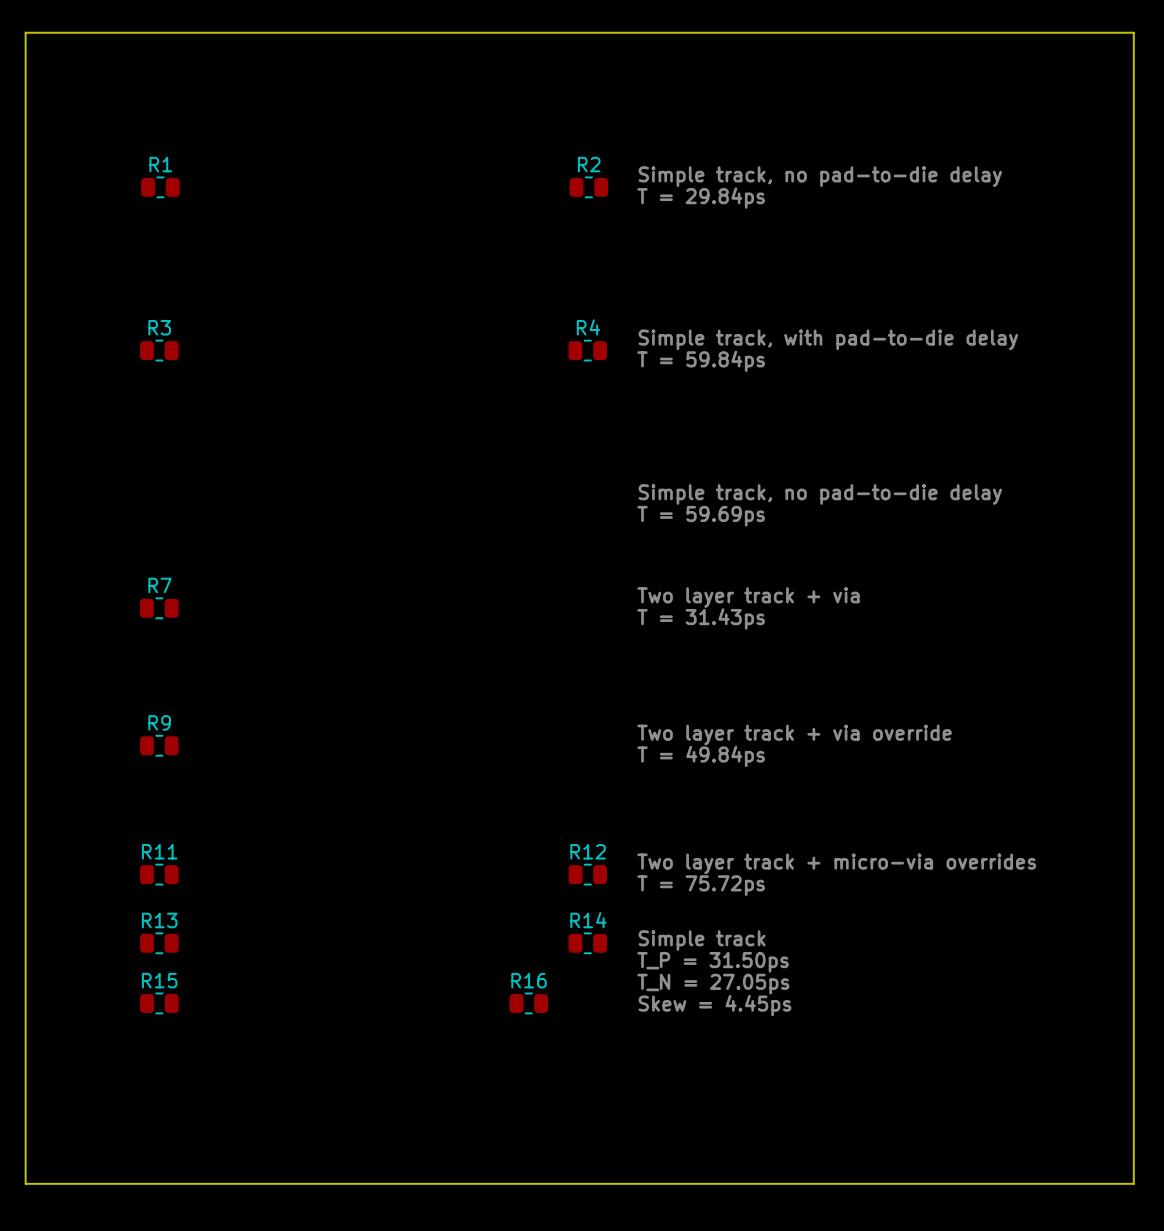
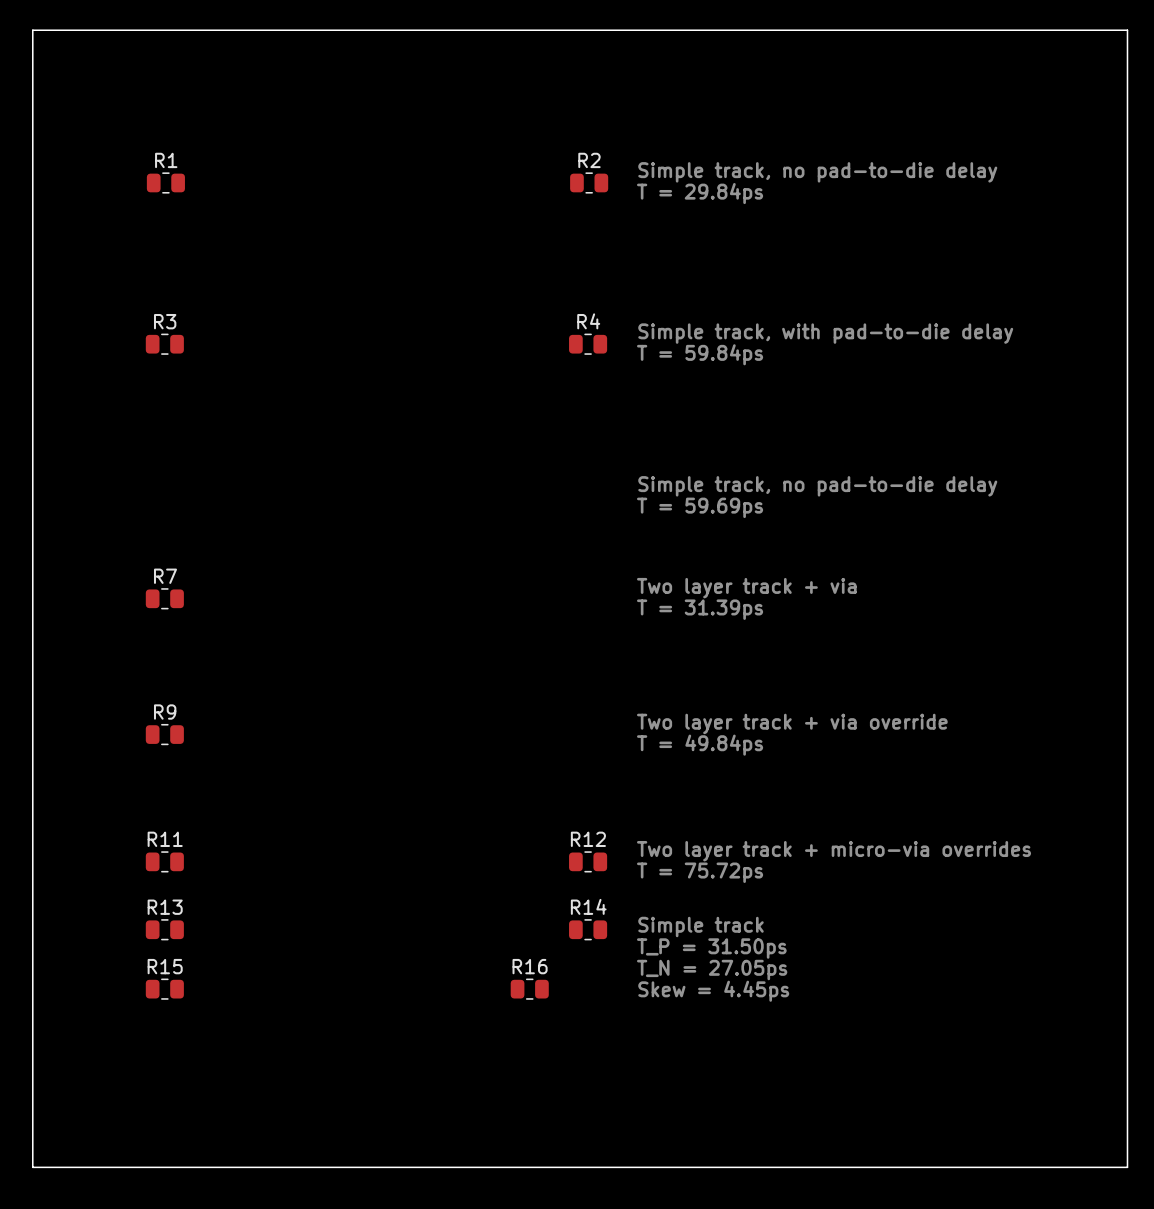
text: T = 31.43ps (701, 618) -> T = 31.39ps (700, 609)

